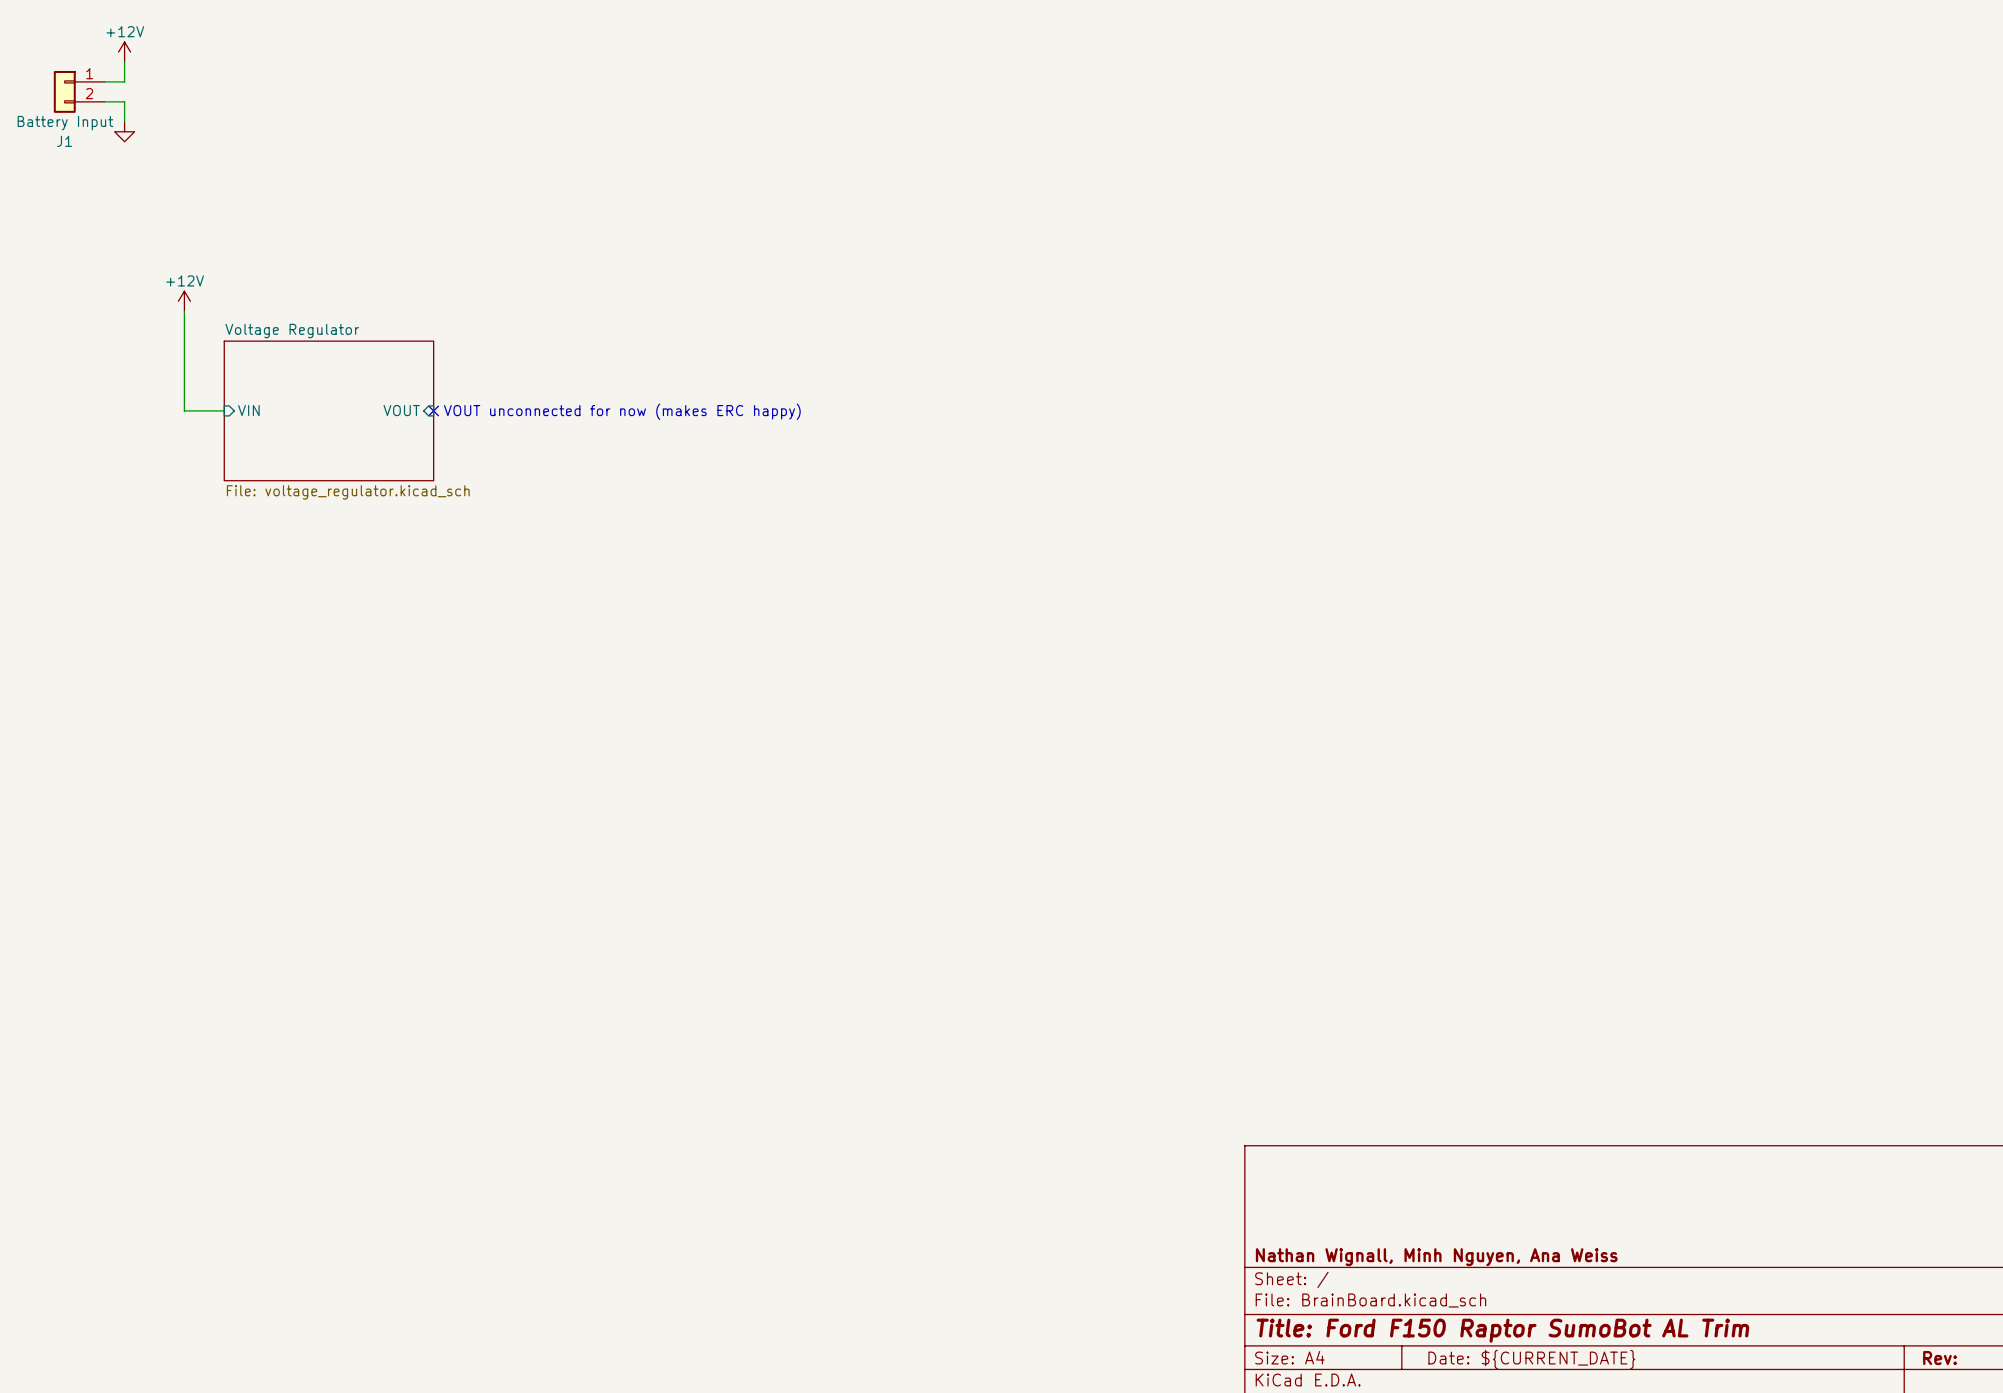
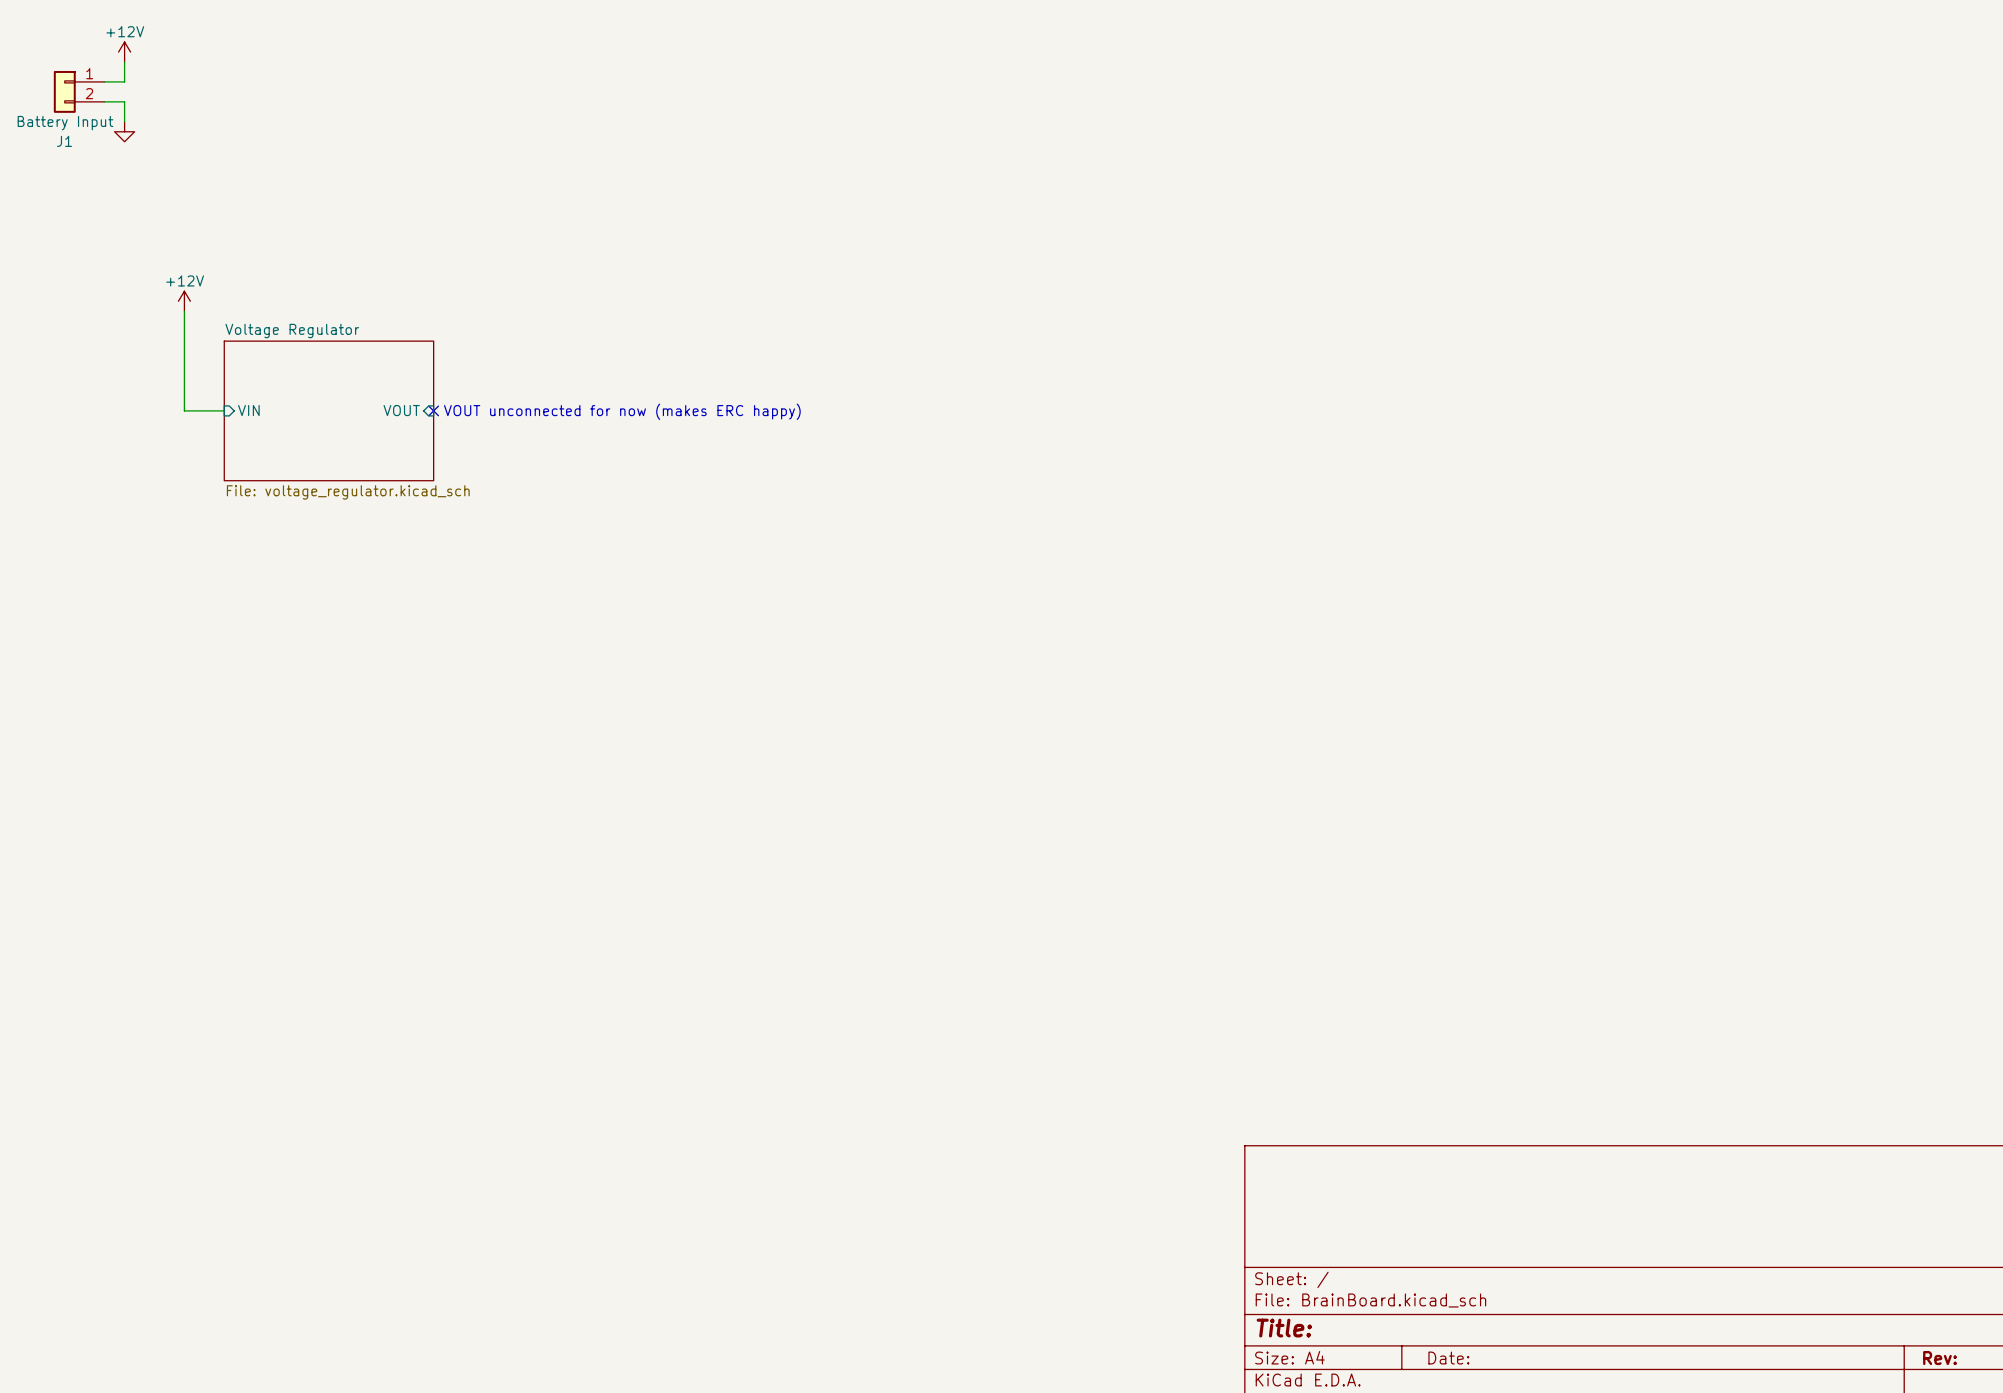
title block: Nathan Wignall, Minh Nguyen, Ana Weiss (1436, 1257) -> none
title block: Title: Ford F150 Raptor SumoBot AL Trim (1502, 1330) -> Title: (1284, 1328)
title block: Date: ${CURRENT_DATE} (1531, 1359) -> Date: (1448, 1358)

